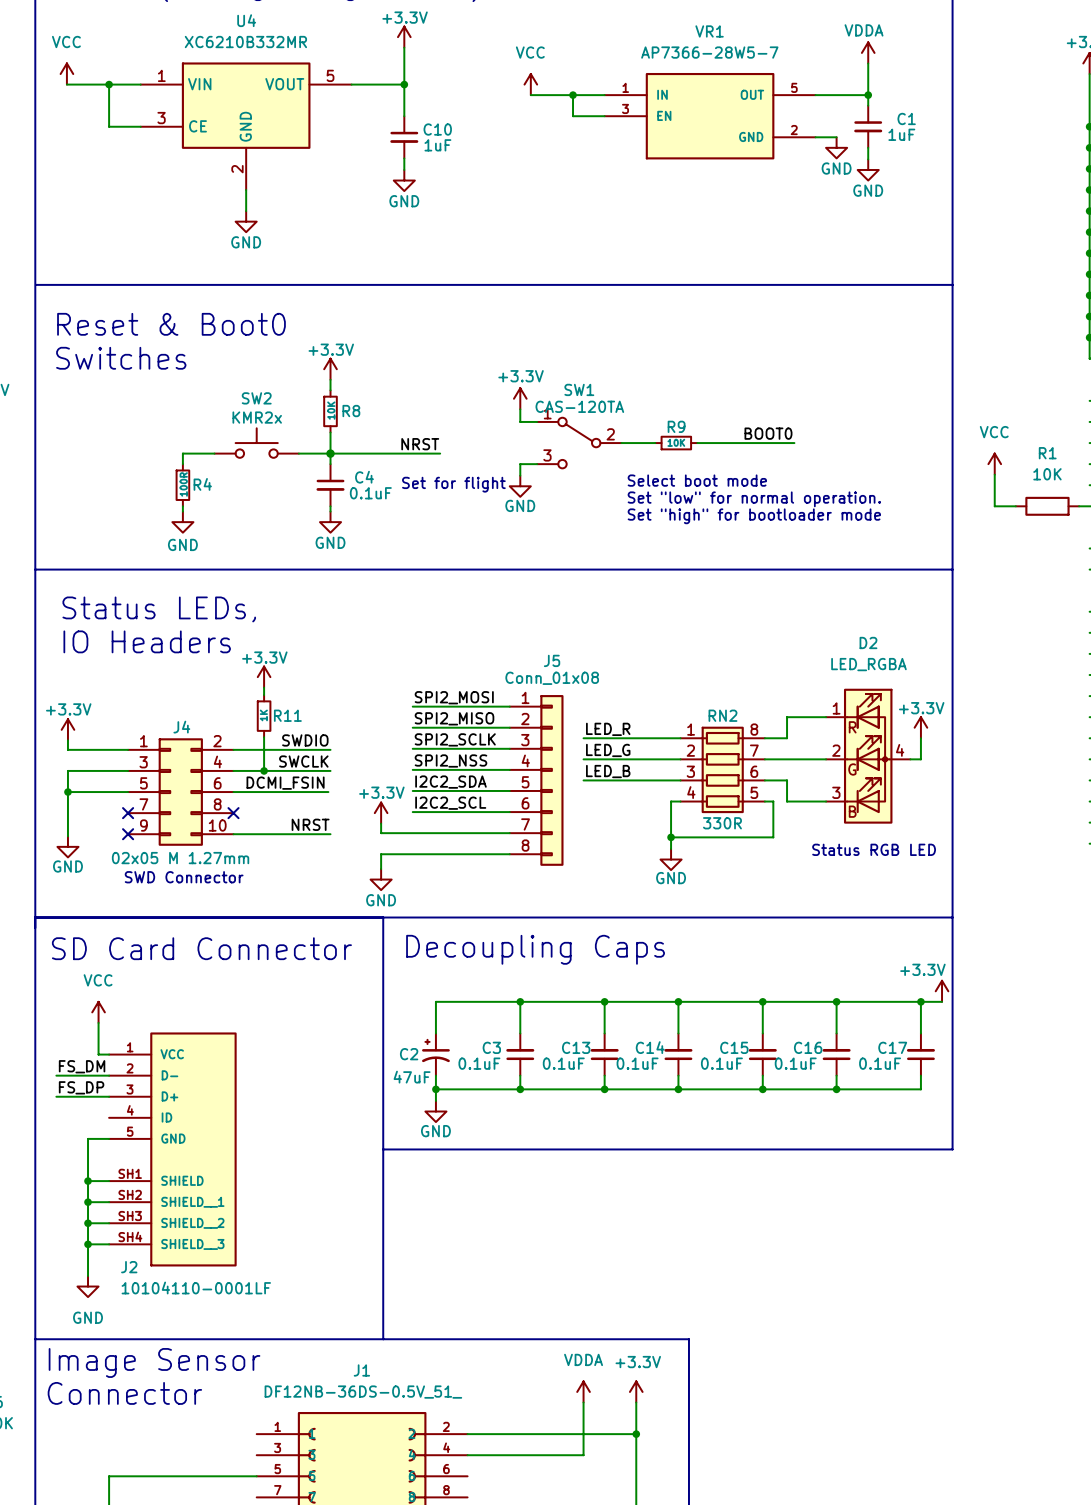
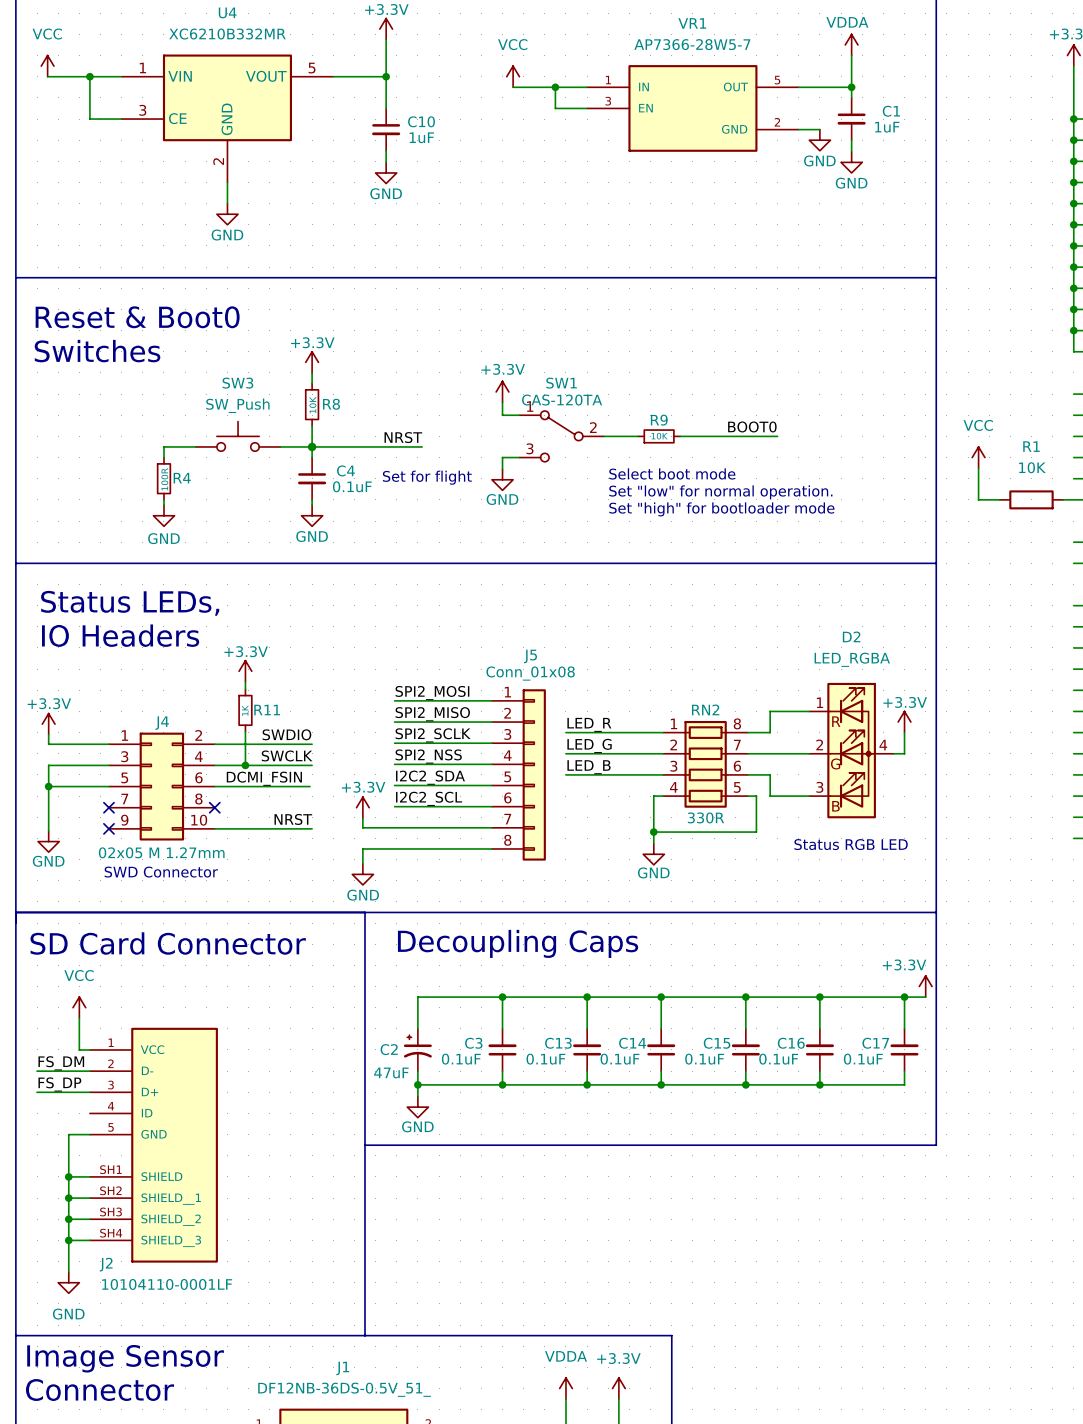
SW2 name: SW2 (256, 398) -> SW3 (237, 383)
SW2 value: KMR2x (257, 417) -> SW_Push (237, 405)

